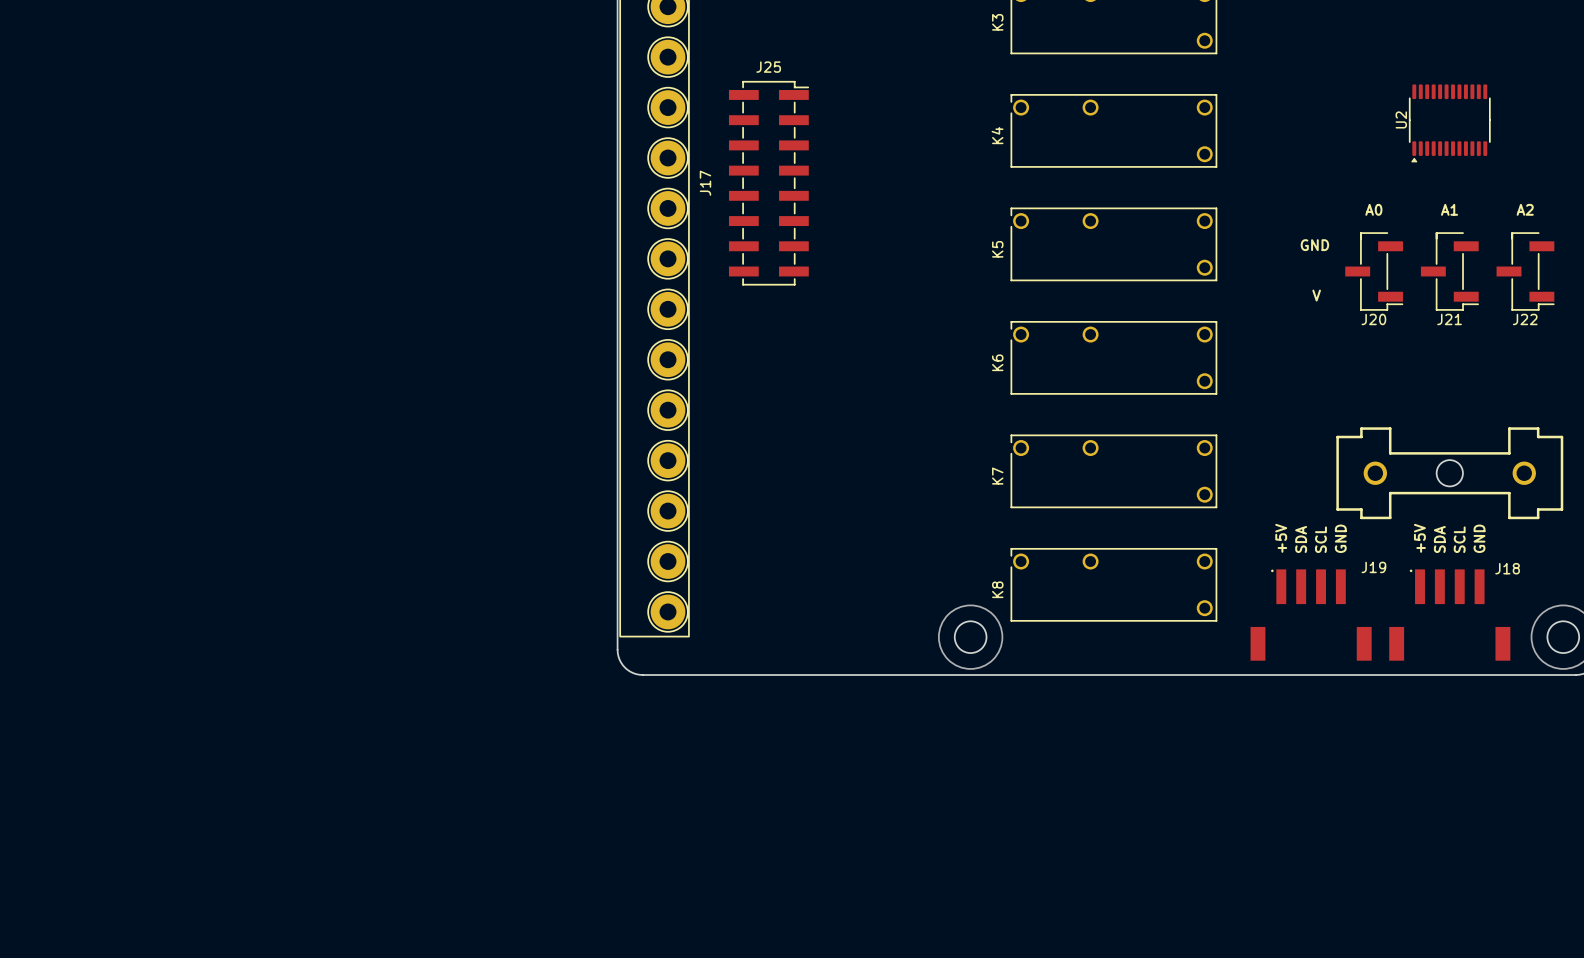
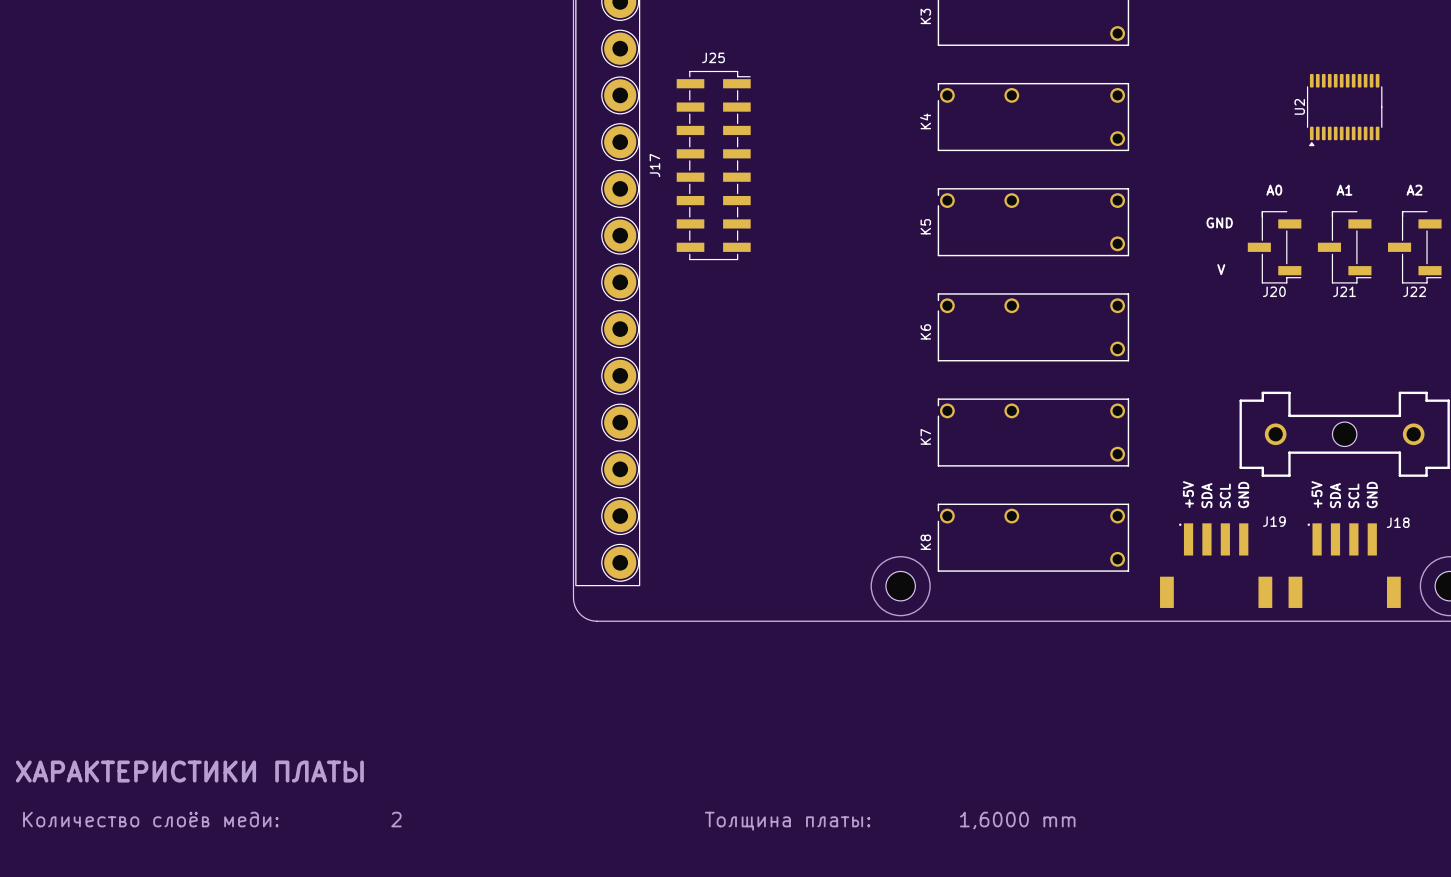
text: none -> ХАРАКТЕРИСТИКИ ПЛАТЫ (189, 771)
text: none -> Количество слоёв меди: (150, 819)
text: none -> 2 (396, 819)
text: none -> Толщина платы: (787, 821)
text: none -> 1,6000 mm (1017, 820)

